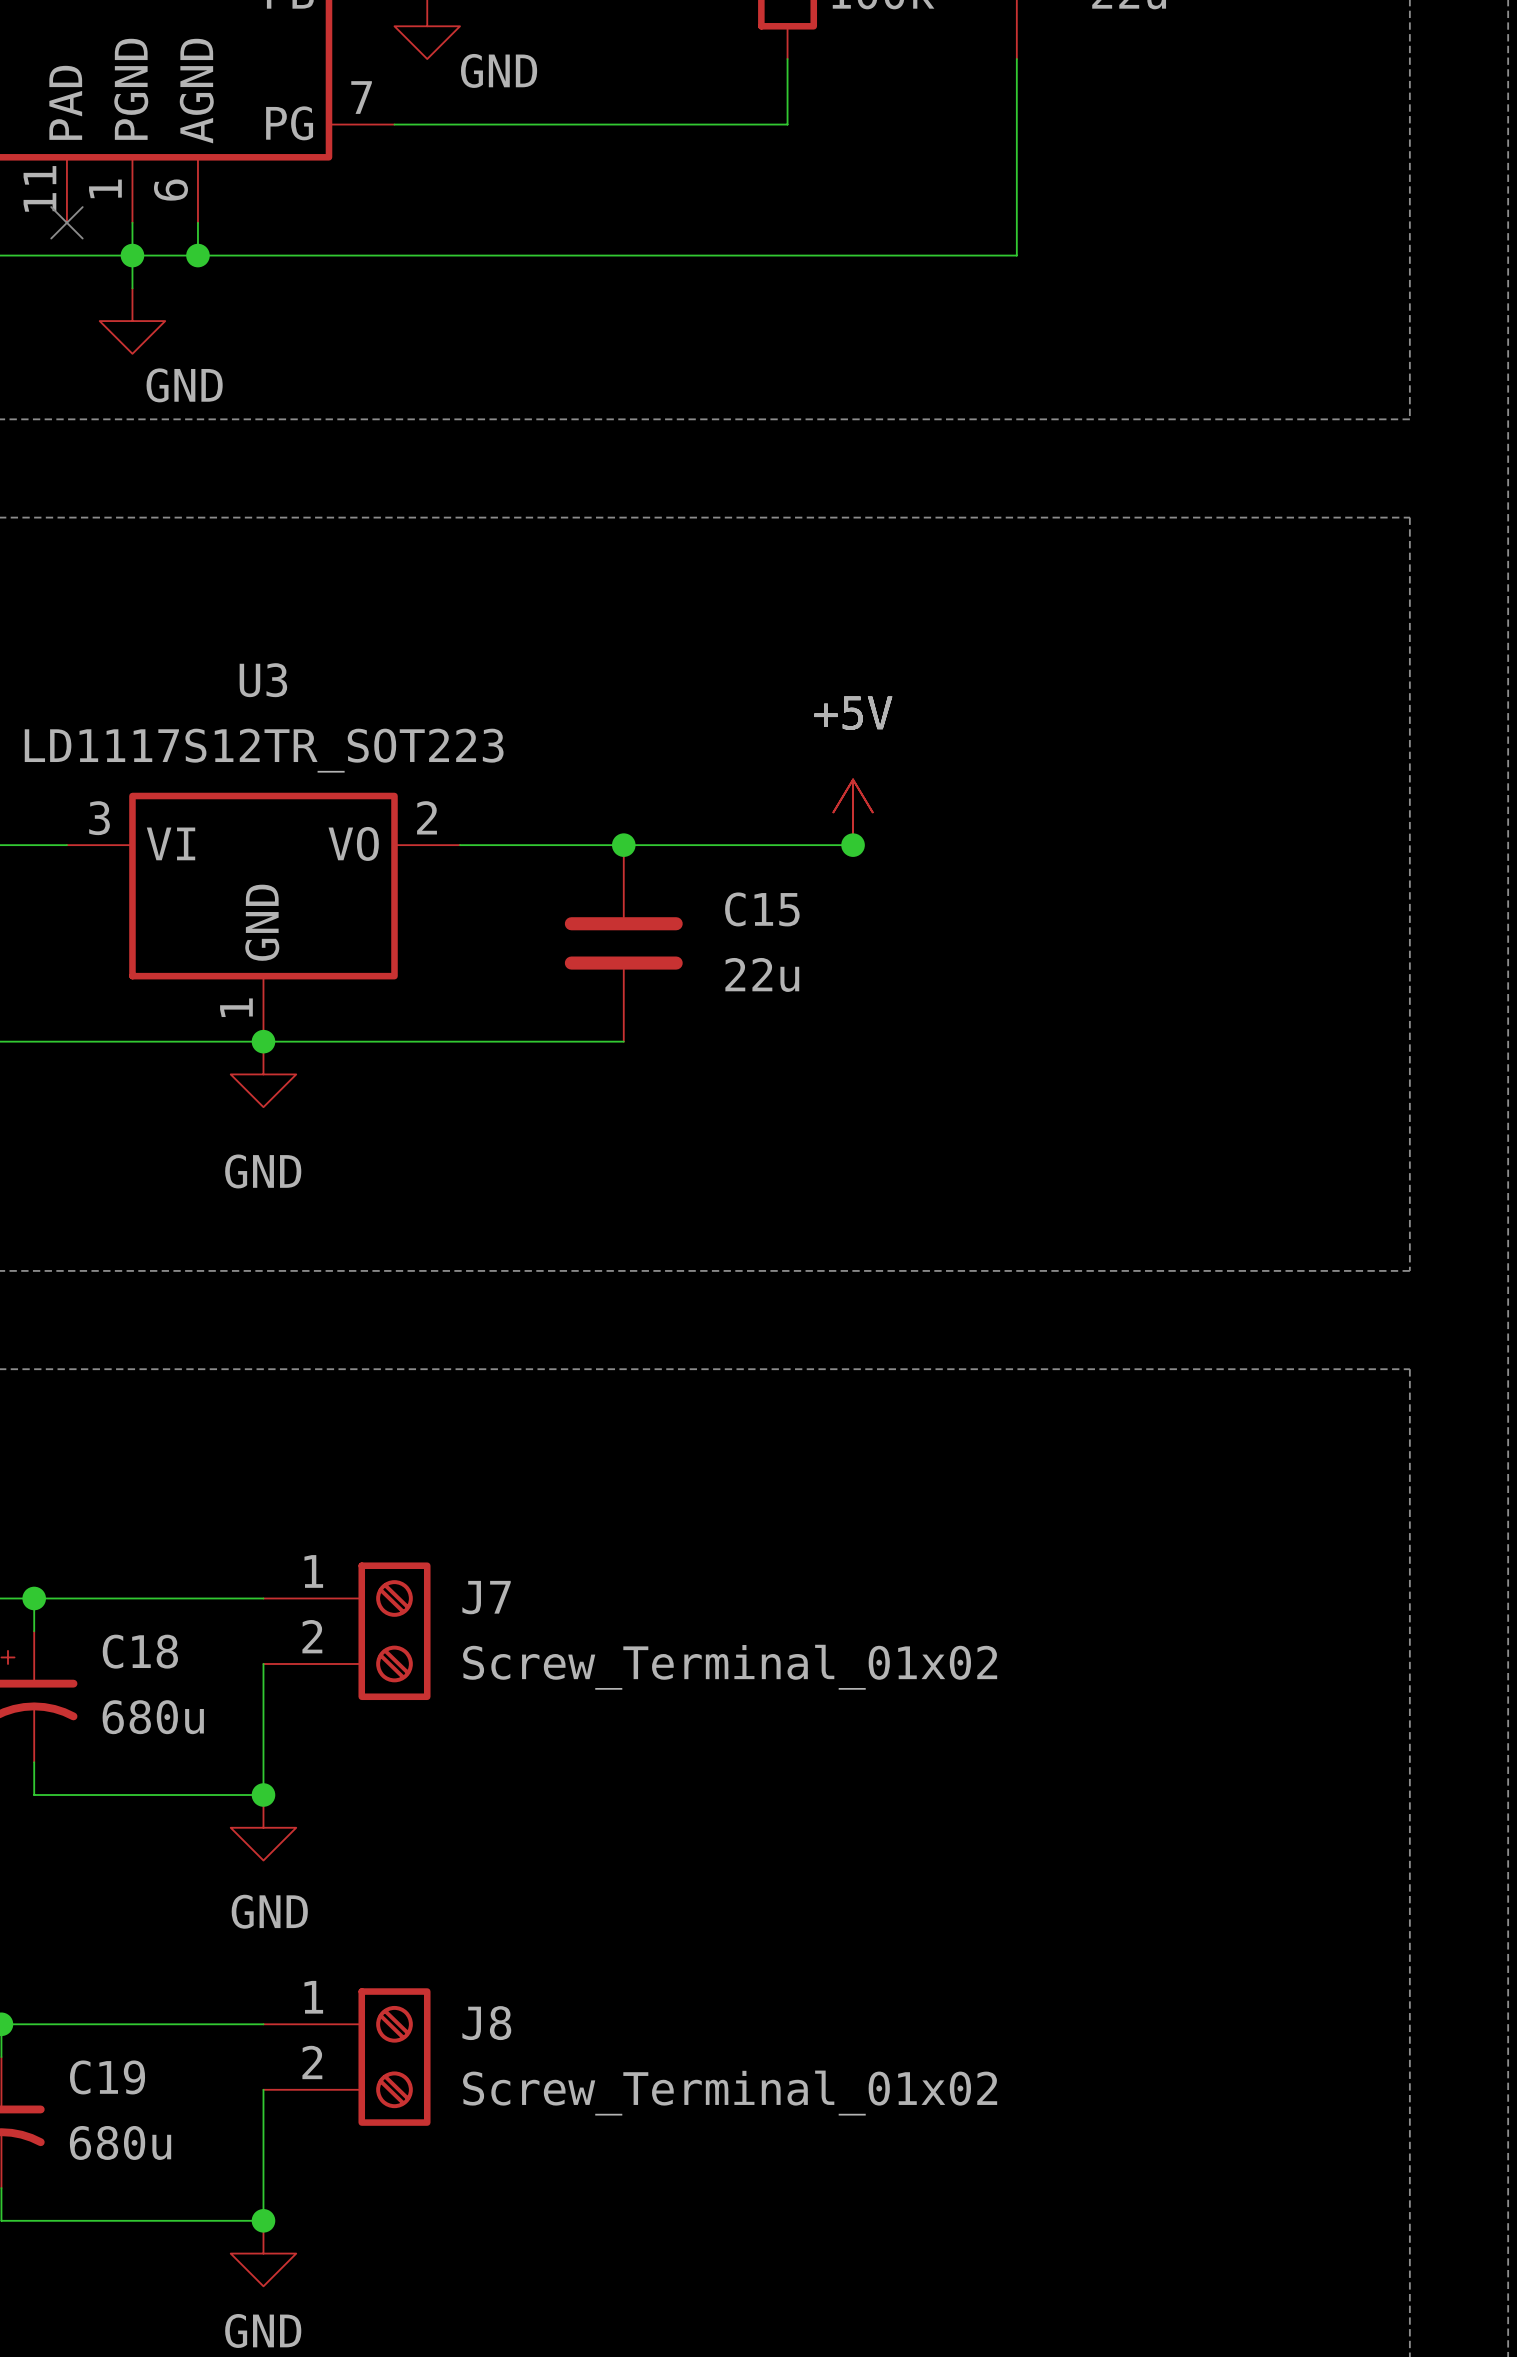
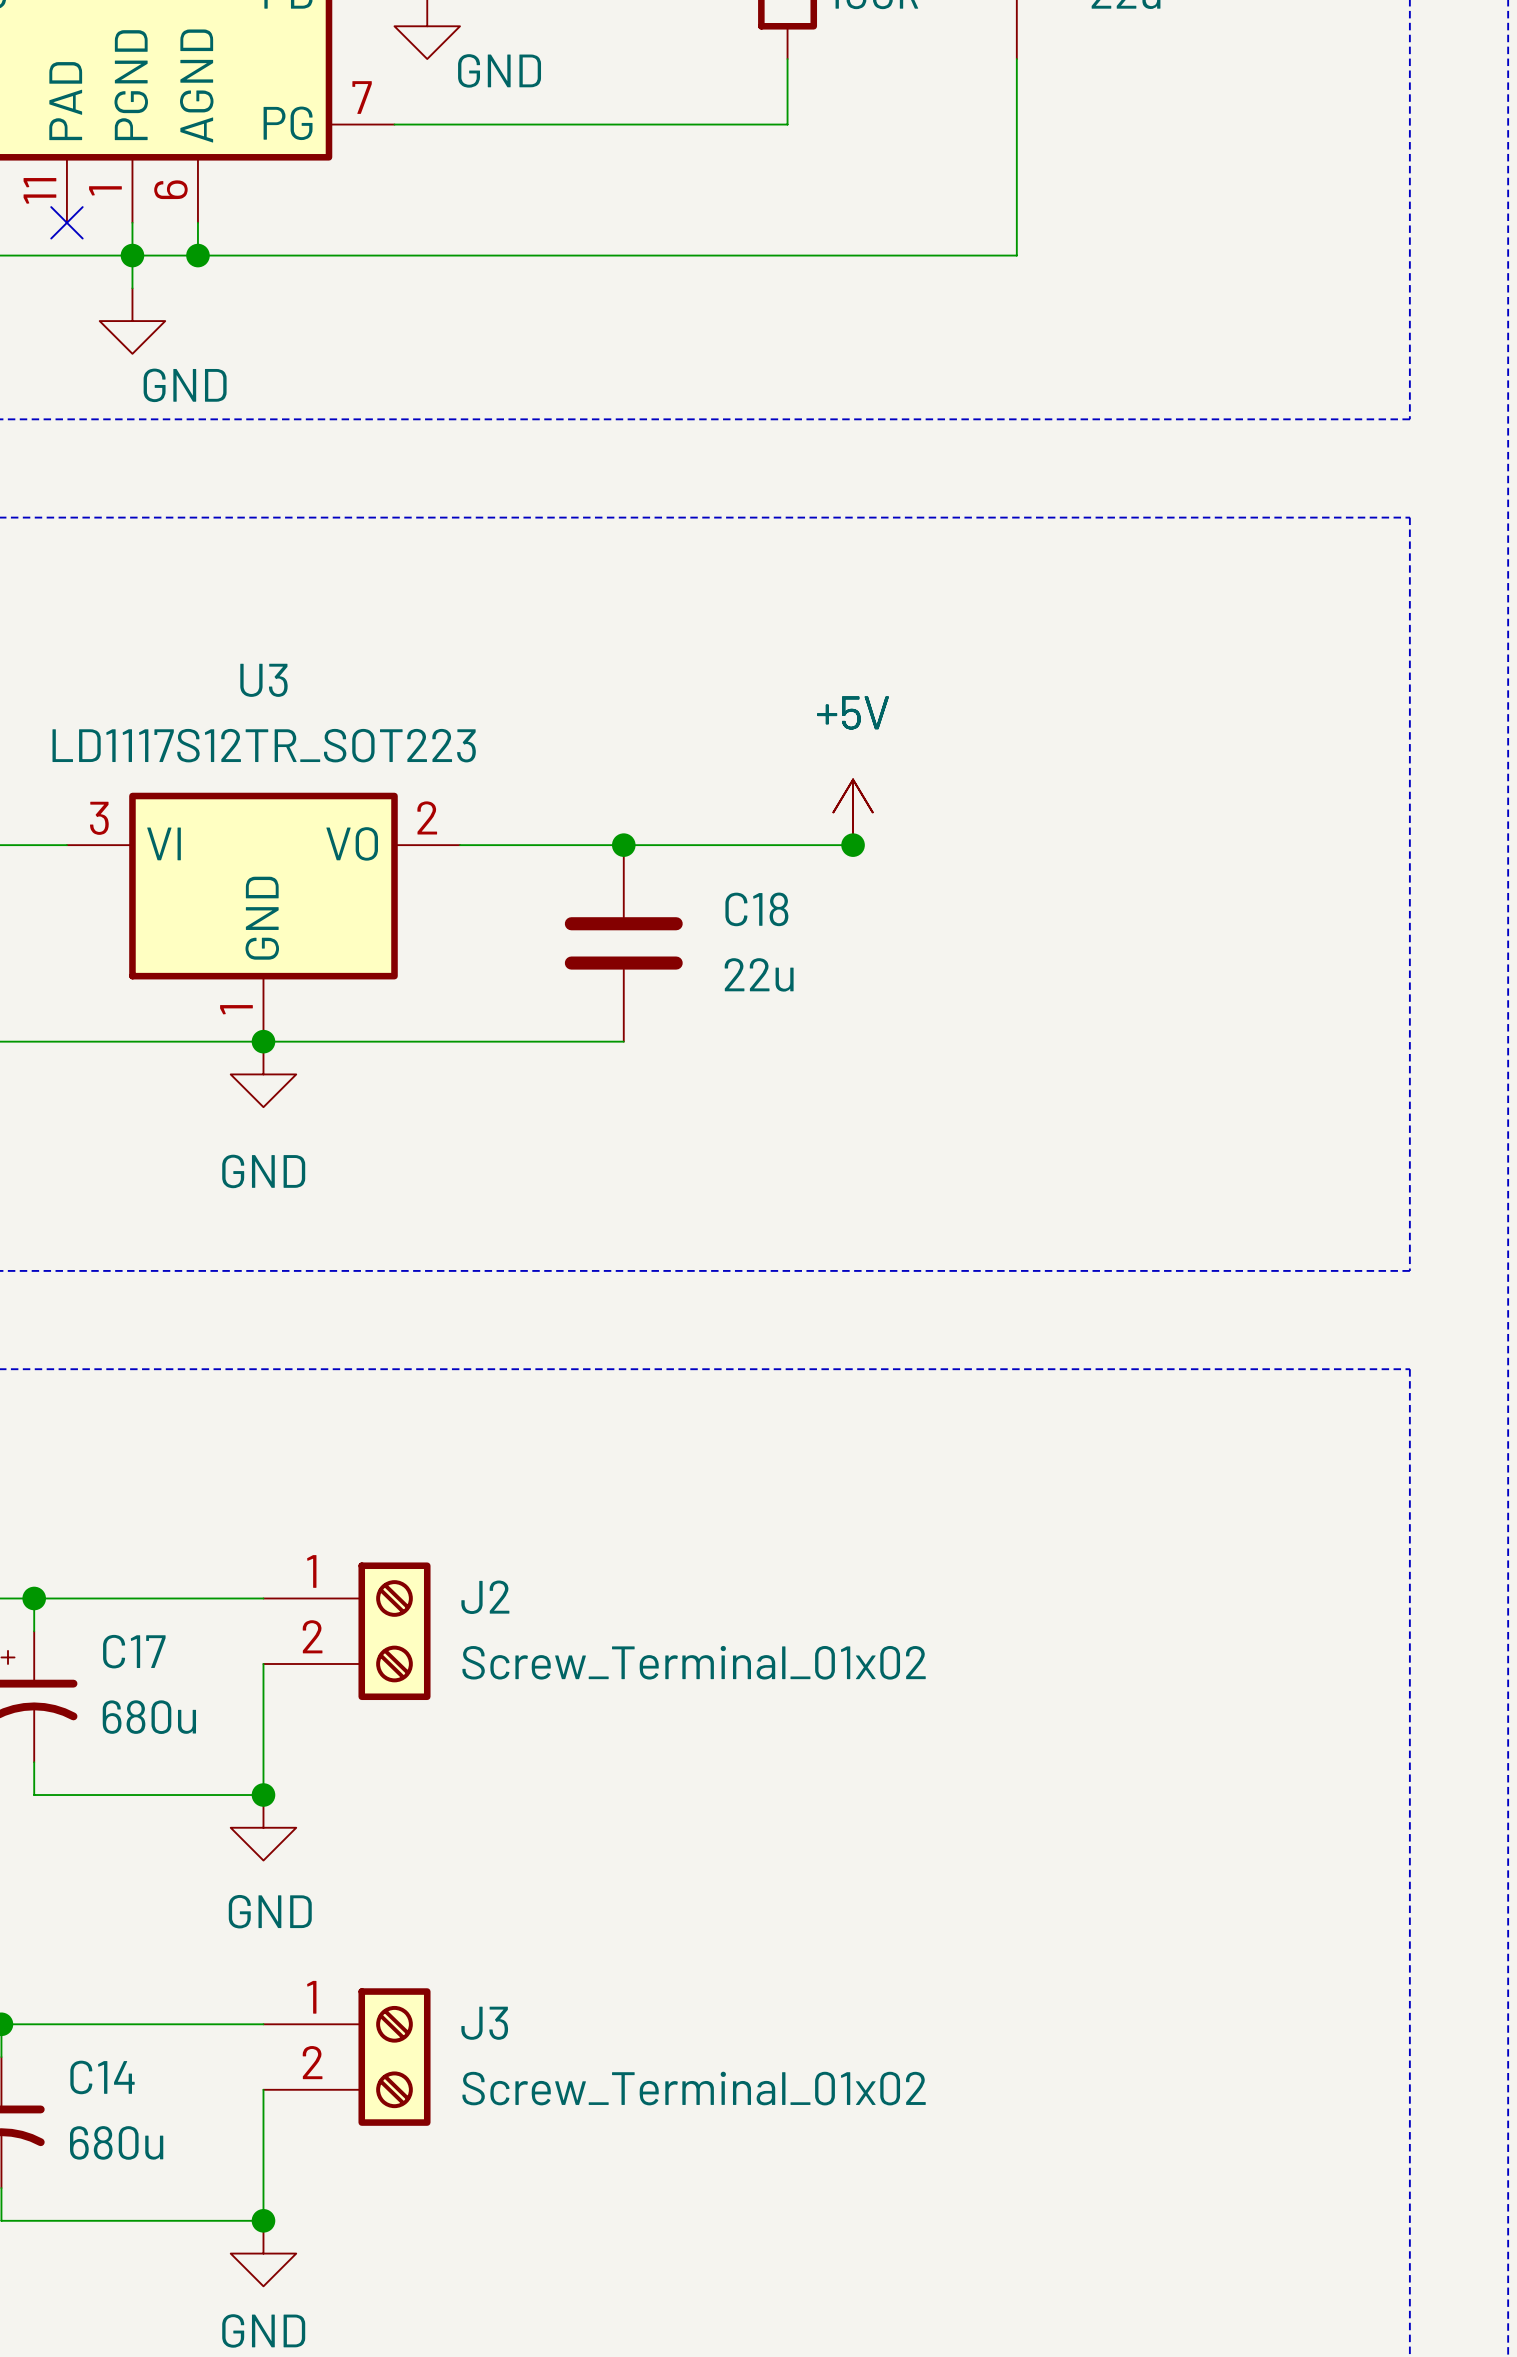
C15 name: C15 (762, 909) -> C18 (756, 909)
J7 name: J7 (486, 1597) -> J2 (485, 1597)
C18 name: C18 (140, 1651) -> C17 (134, 1651)
J8 name: J8 (486, 2023) -> J3 (484, 2023)
C19 name: C19 (107, 2077) -> C14 (102, 2077)

